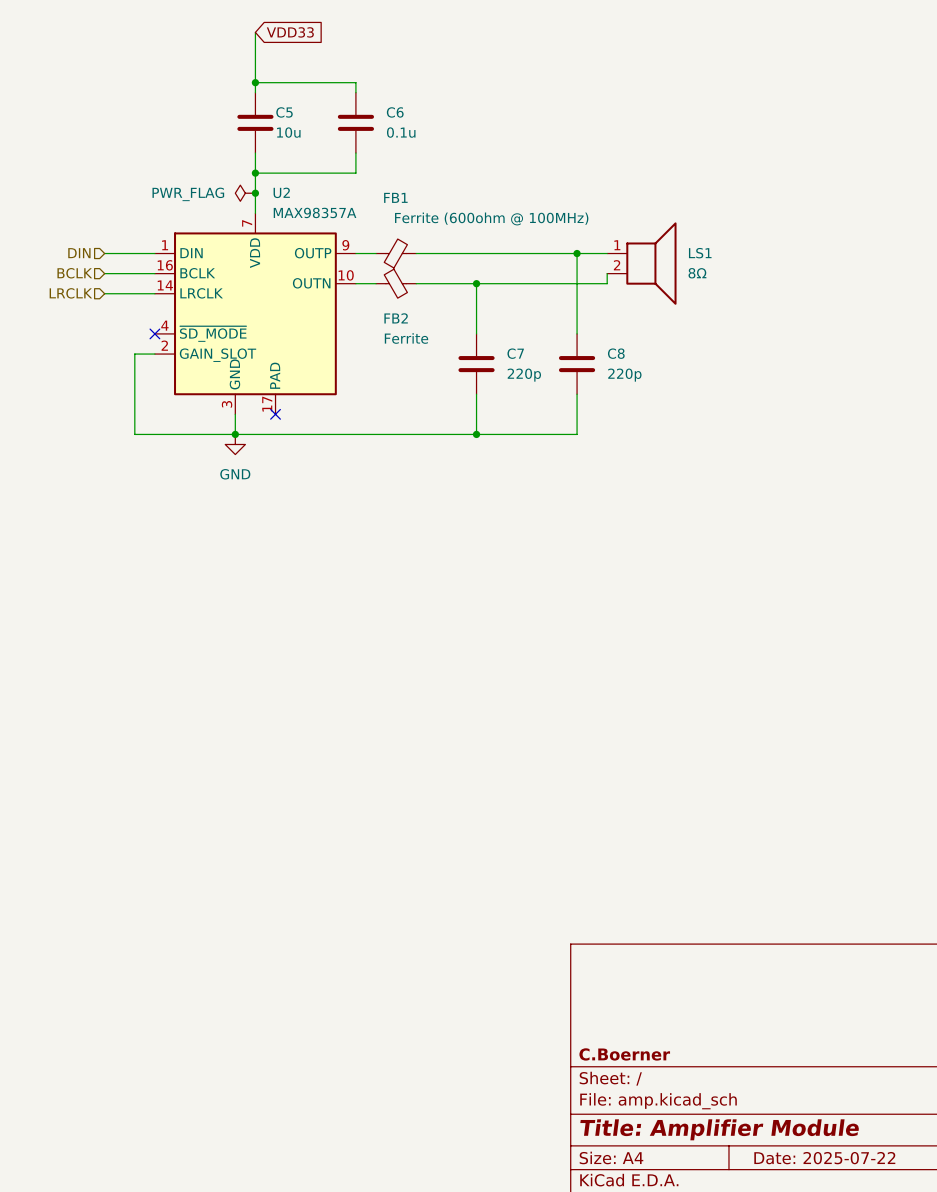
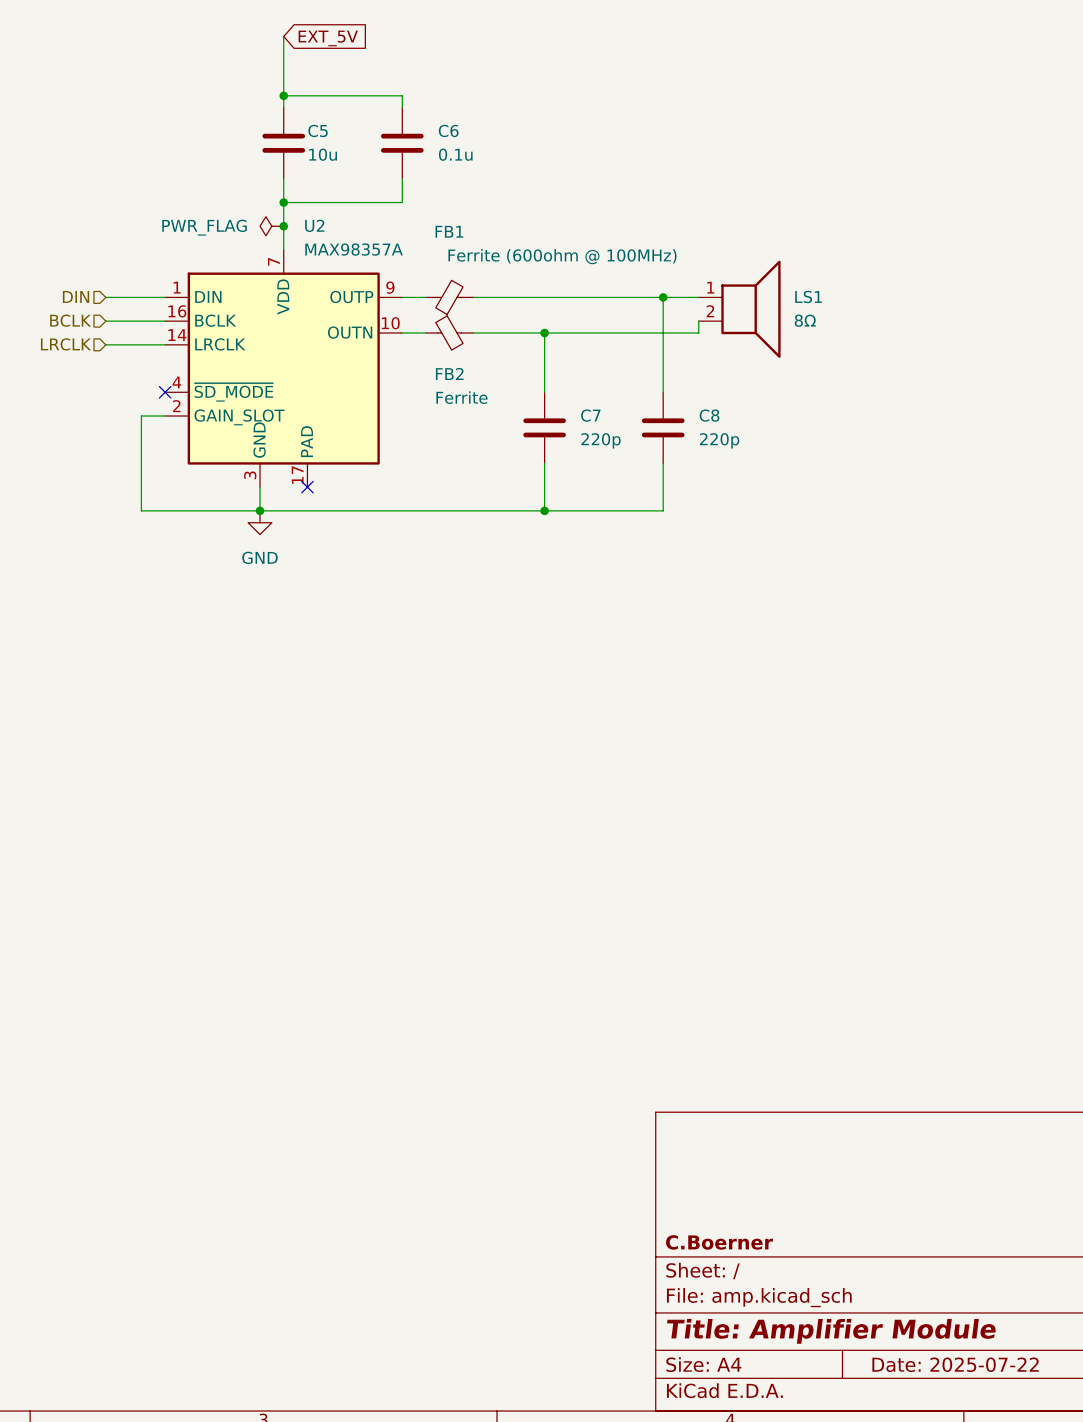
global label: VDD33 (290, 32) -> EXT_5V (328, 38)

